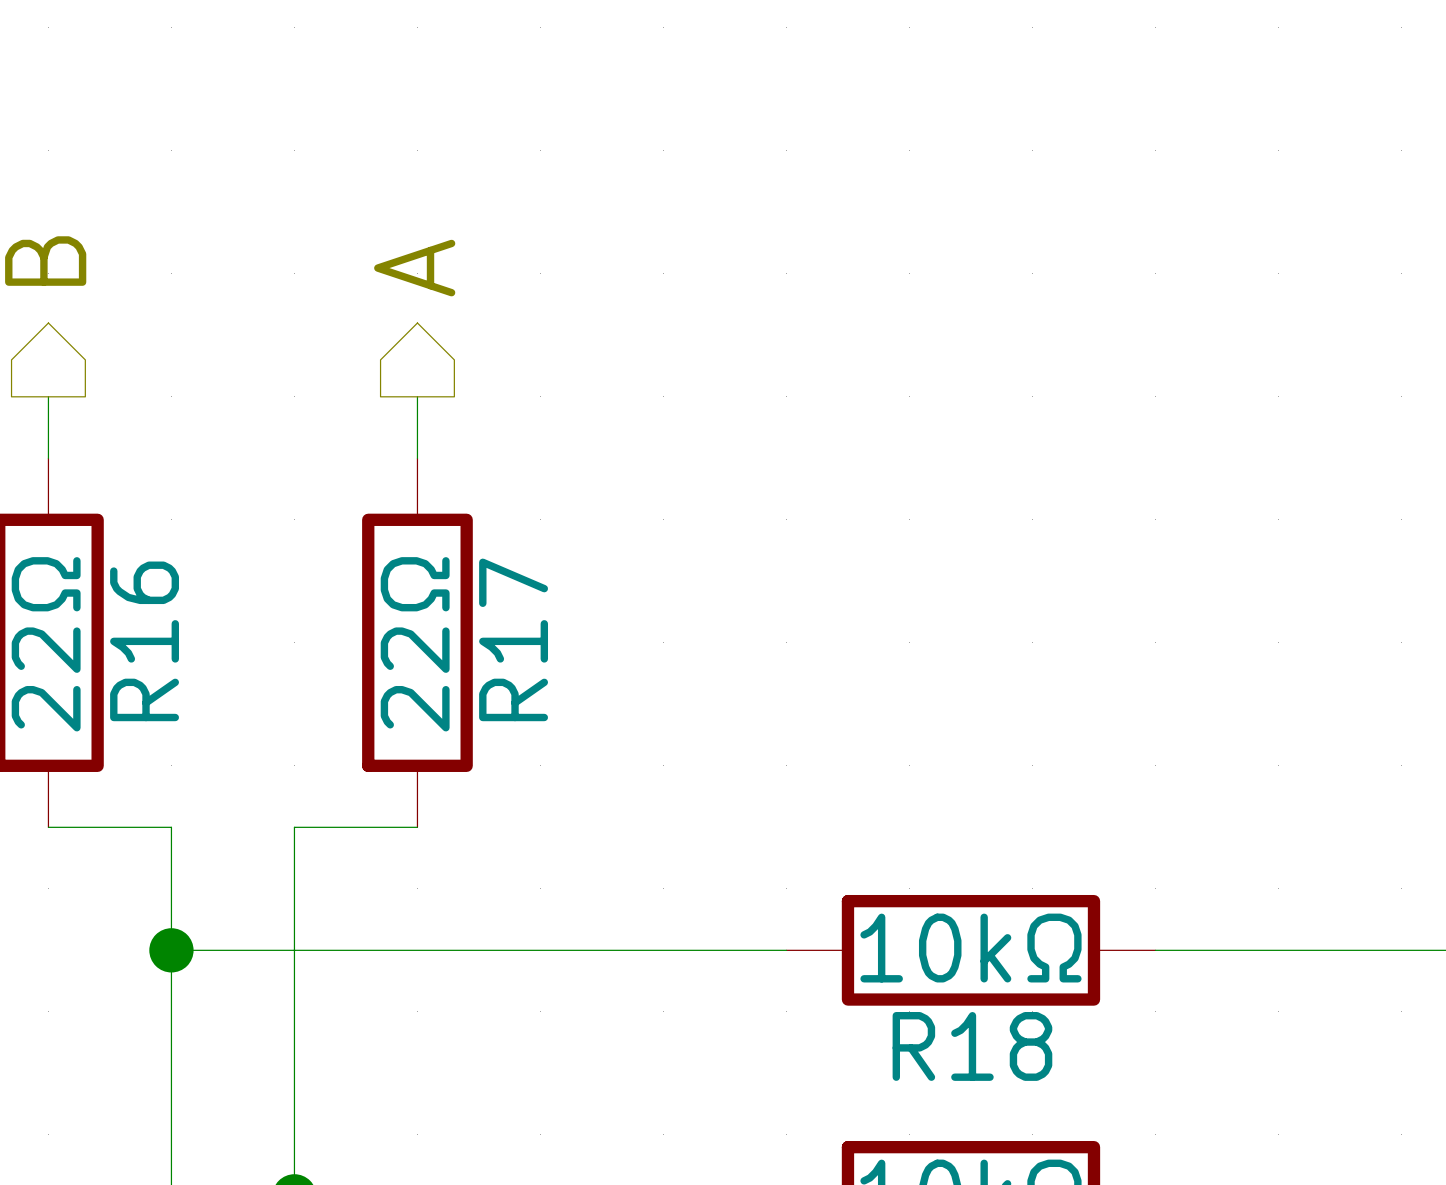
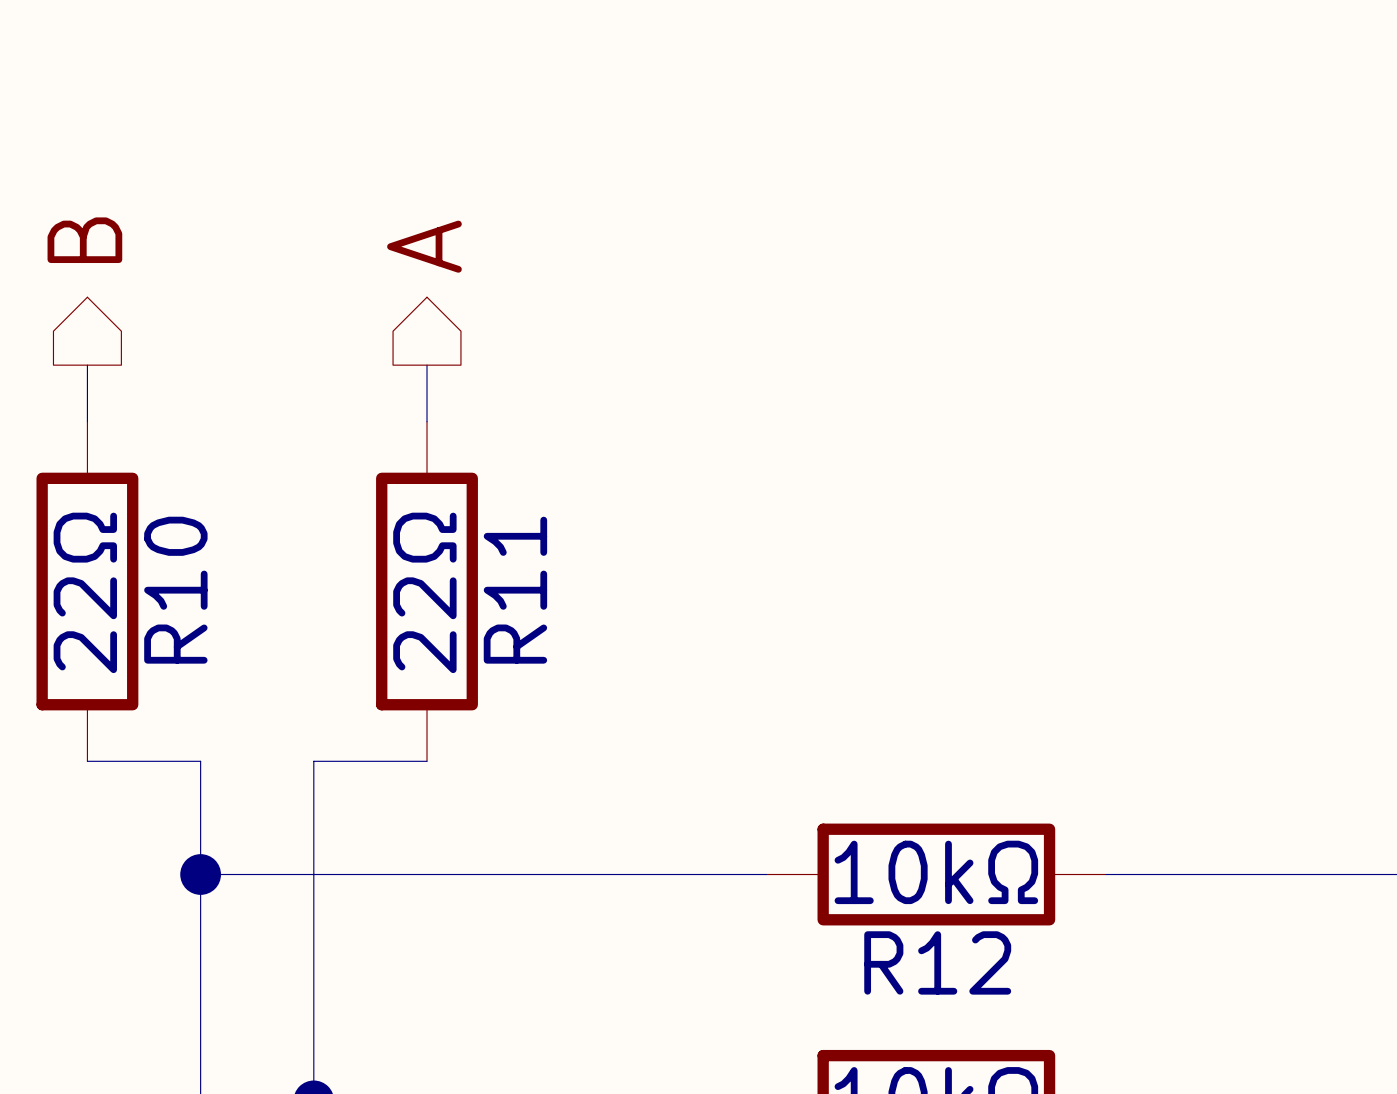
R17 name: R17 (513, 639) -> R11 (515, 590)
R16 name: R16 (144, 641) -> R10 (175, 590)
R18 name: R18 (972, 1046) -> R12 (937, 962)

